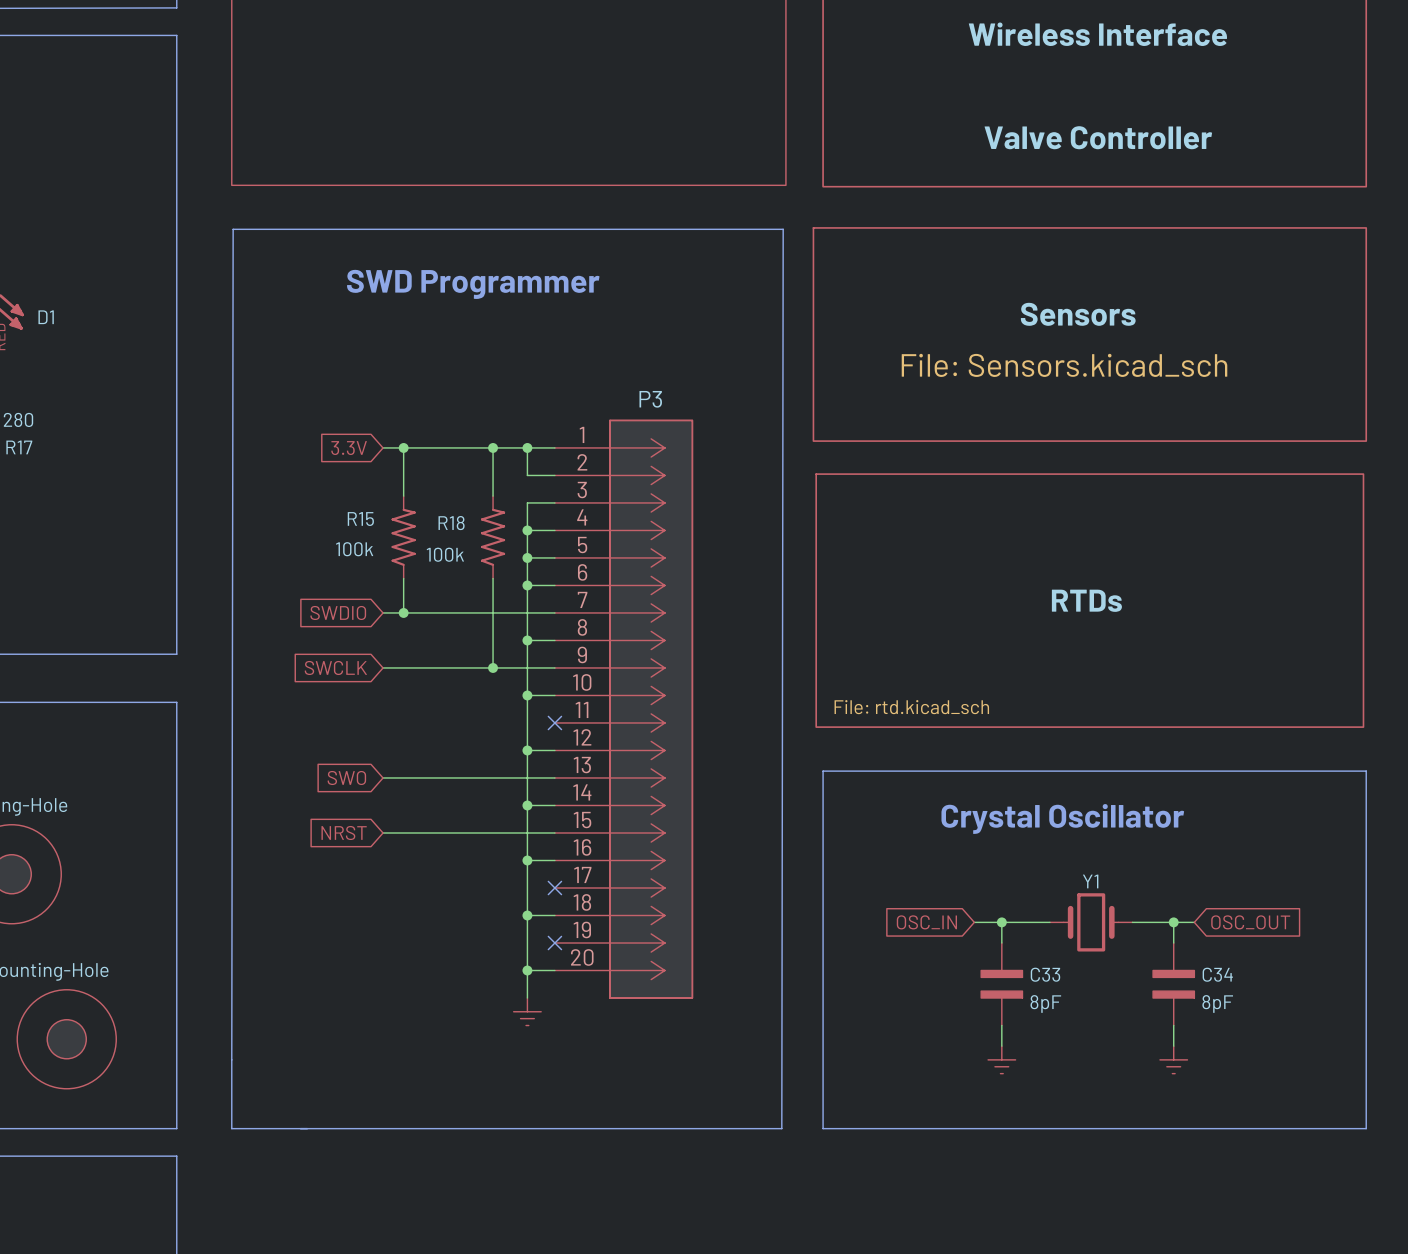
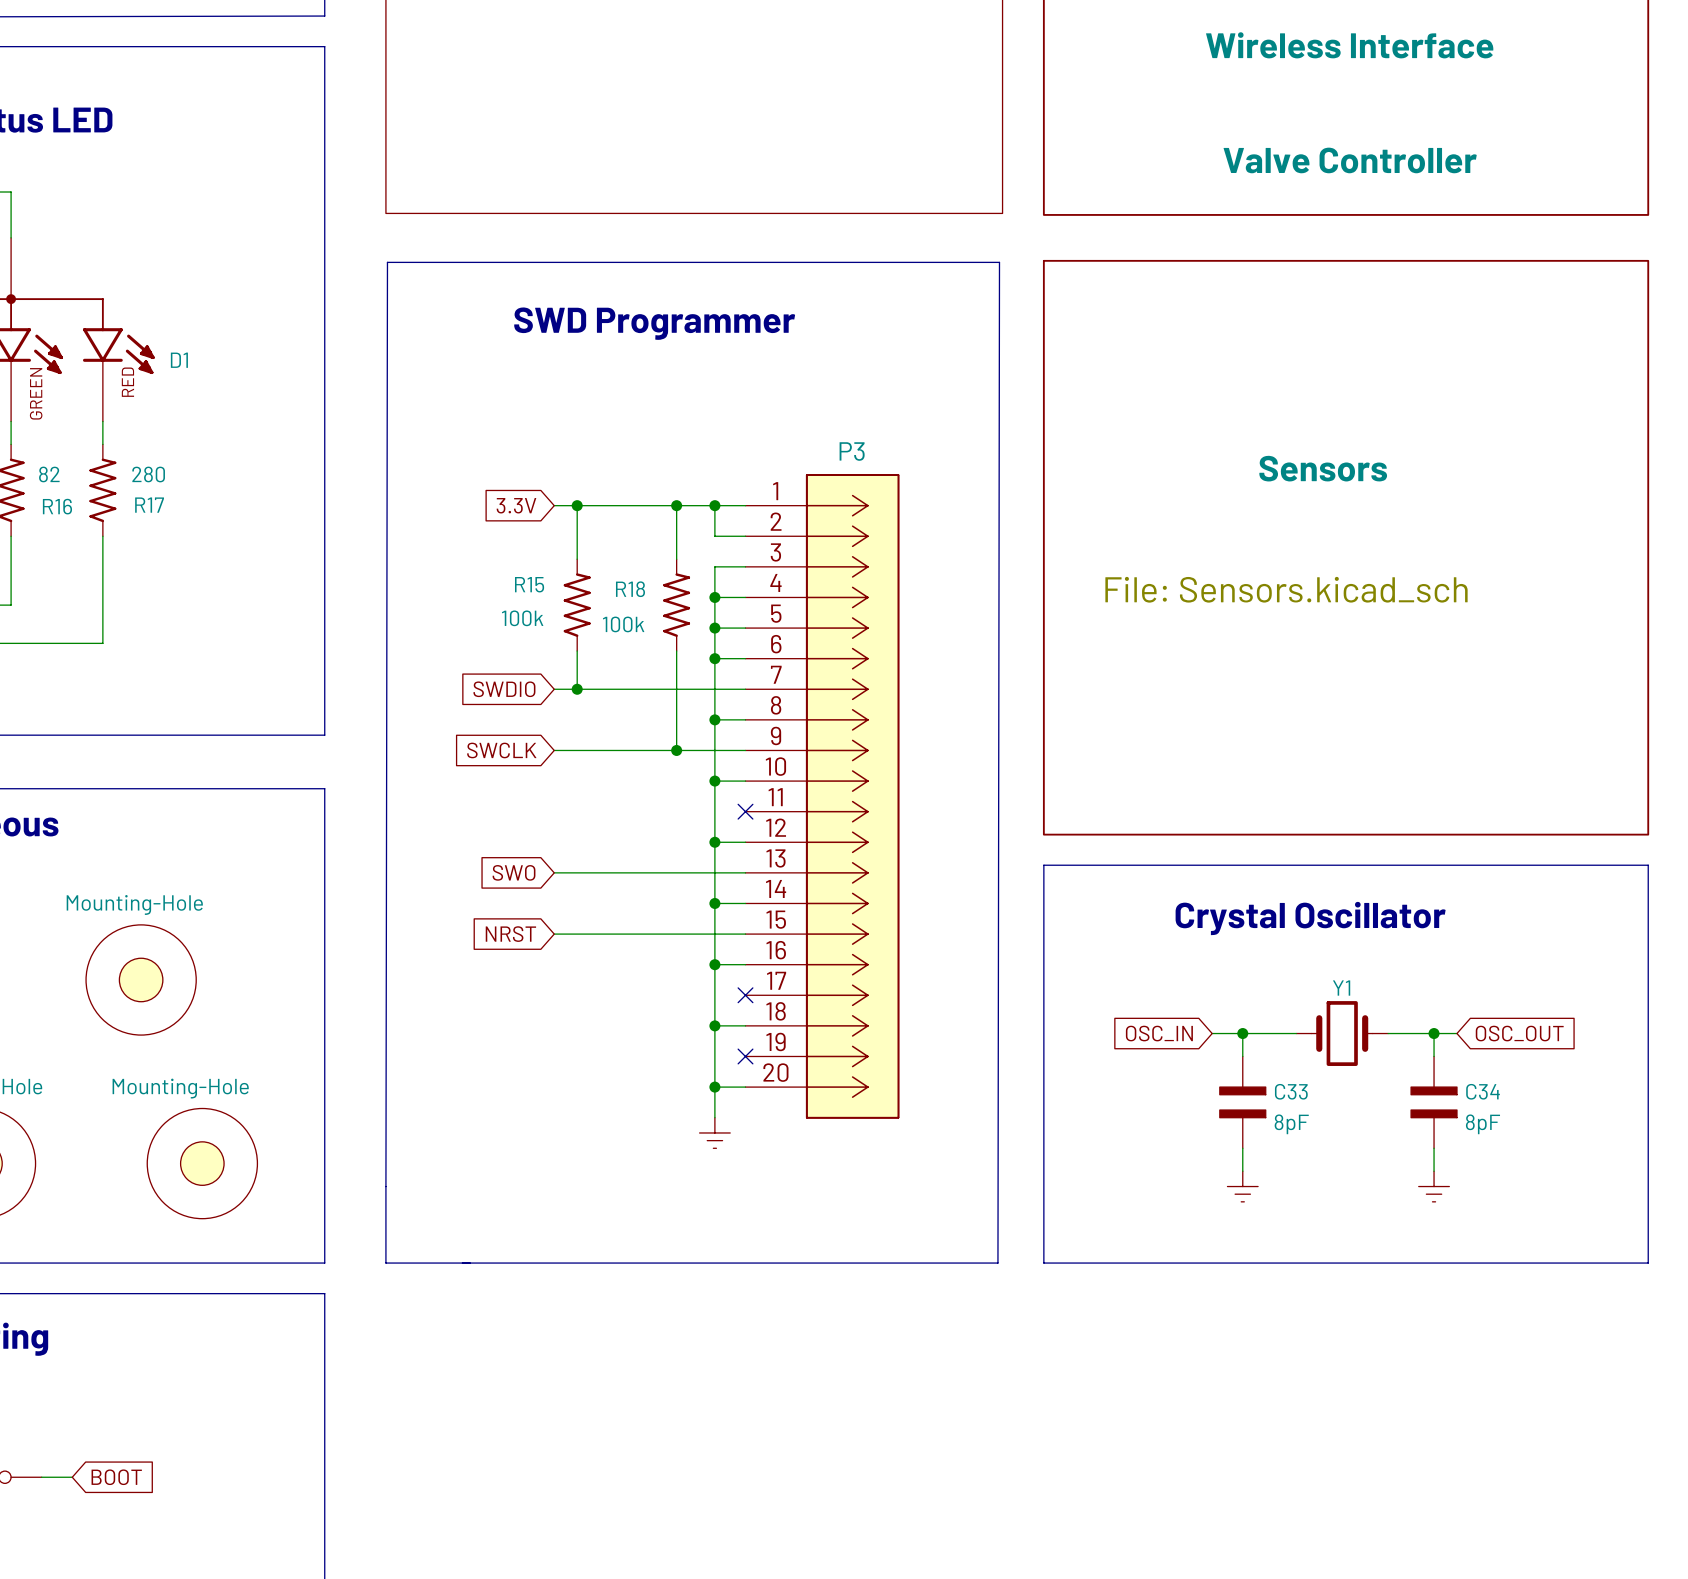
sheet Sensors: File: Sensors.kicad_sch (1089, 334) -> none
sheet Sensors: none -> File: Sensors.kicad_sch (1346, 547)
sheet RTDs: File: rtd.kicad_sch (1089, 600) -> none

